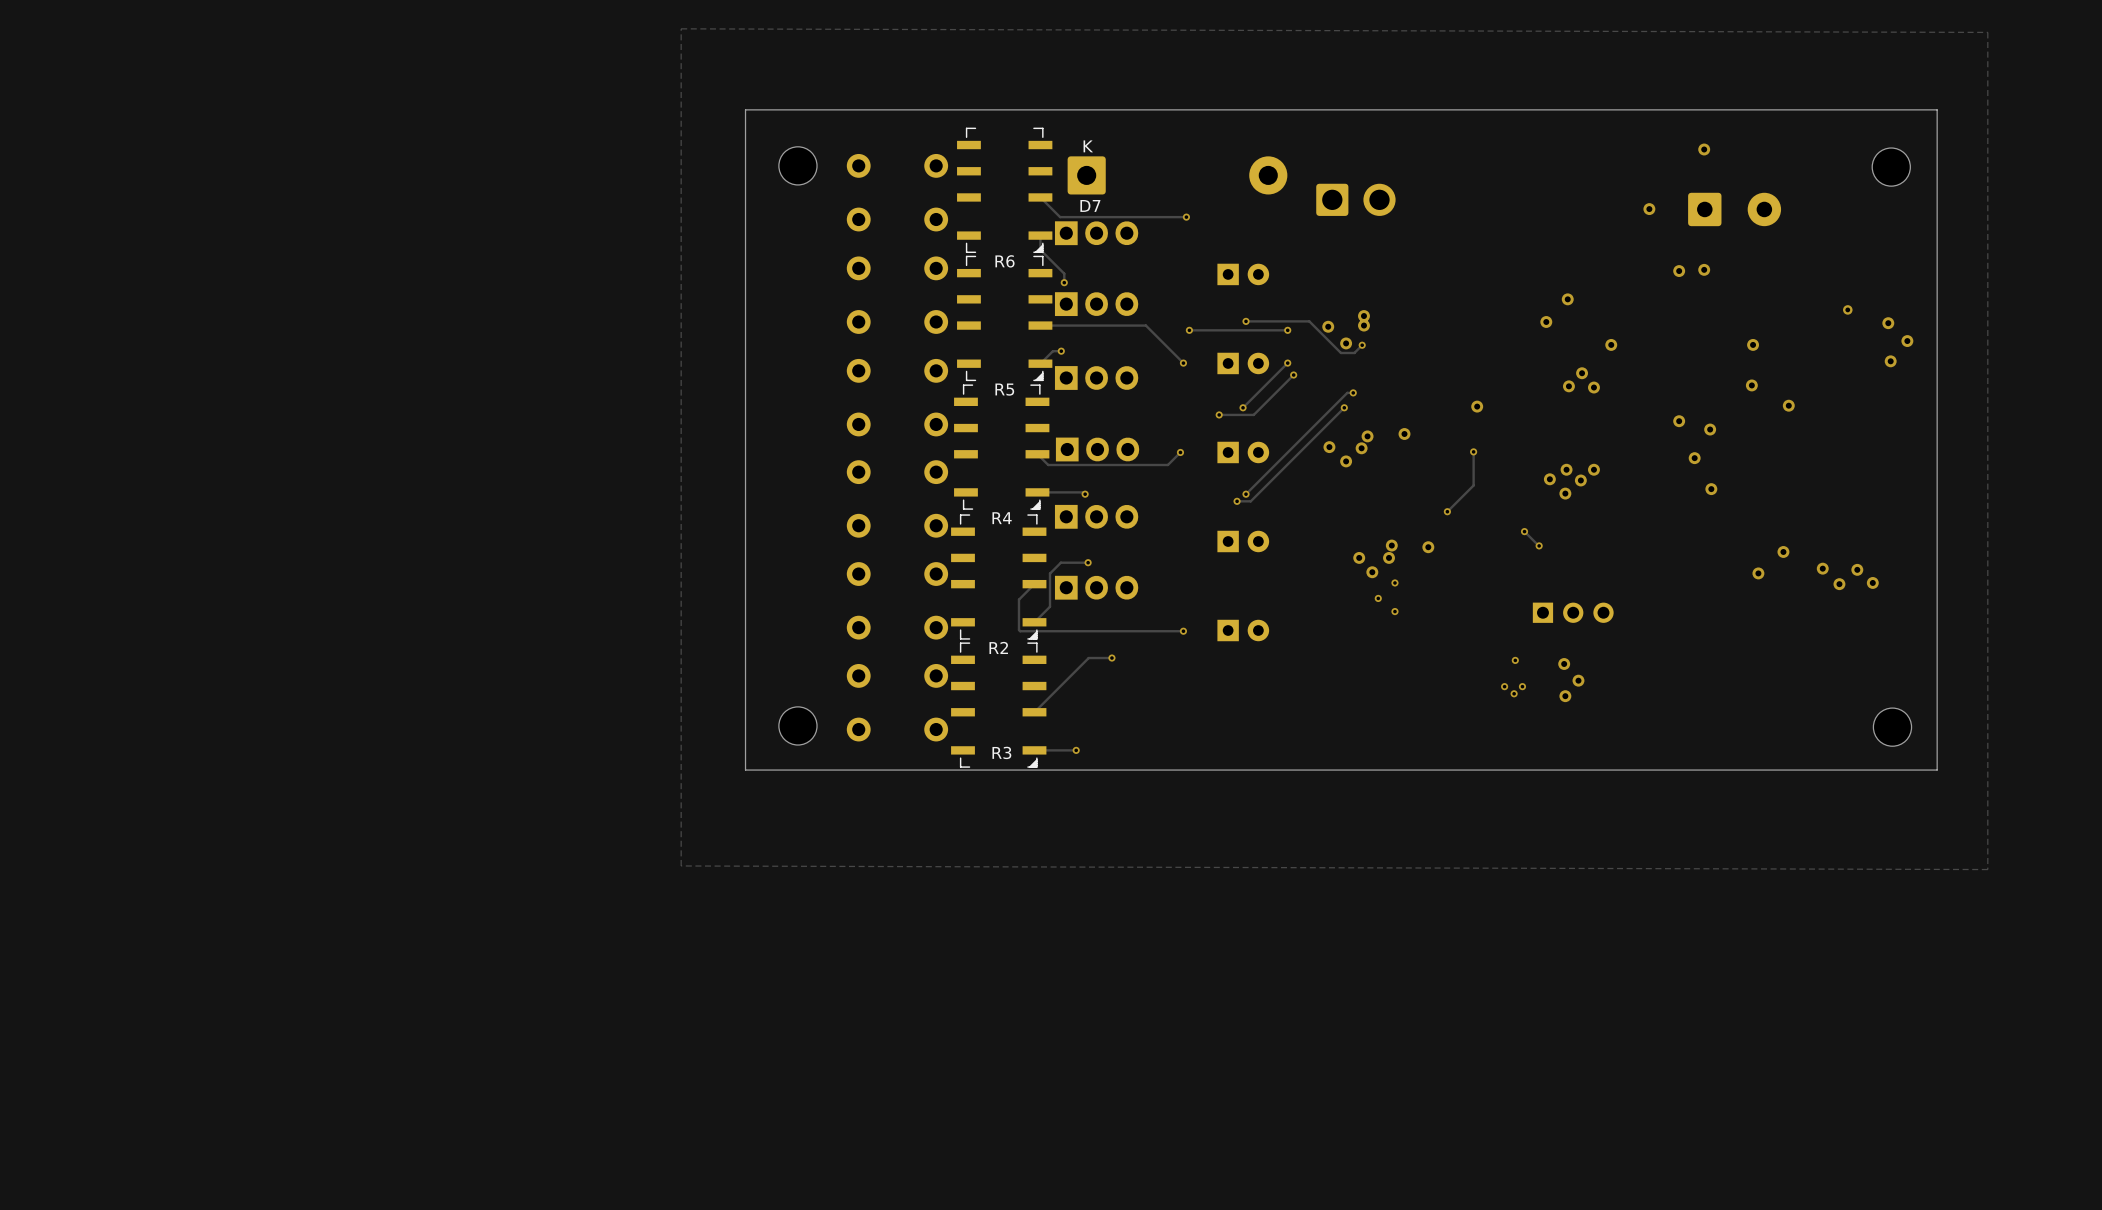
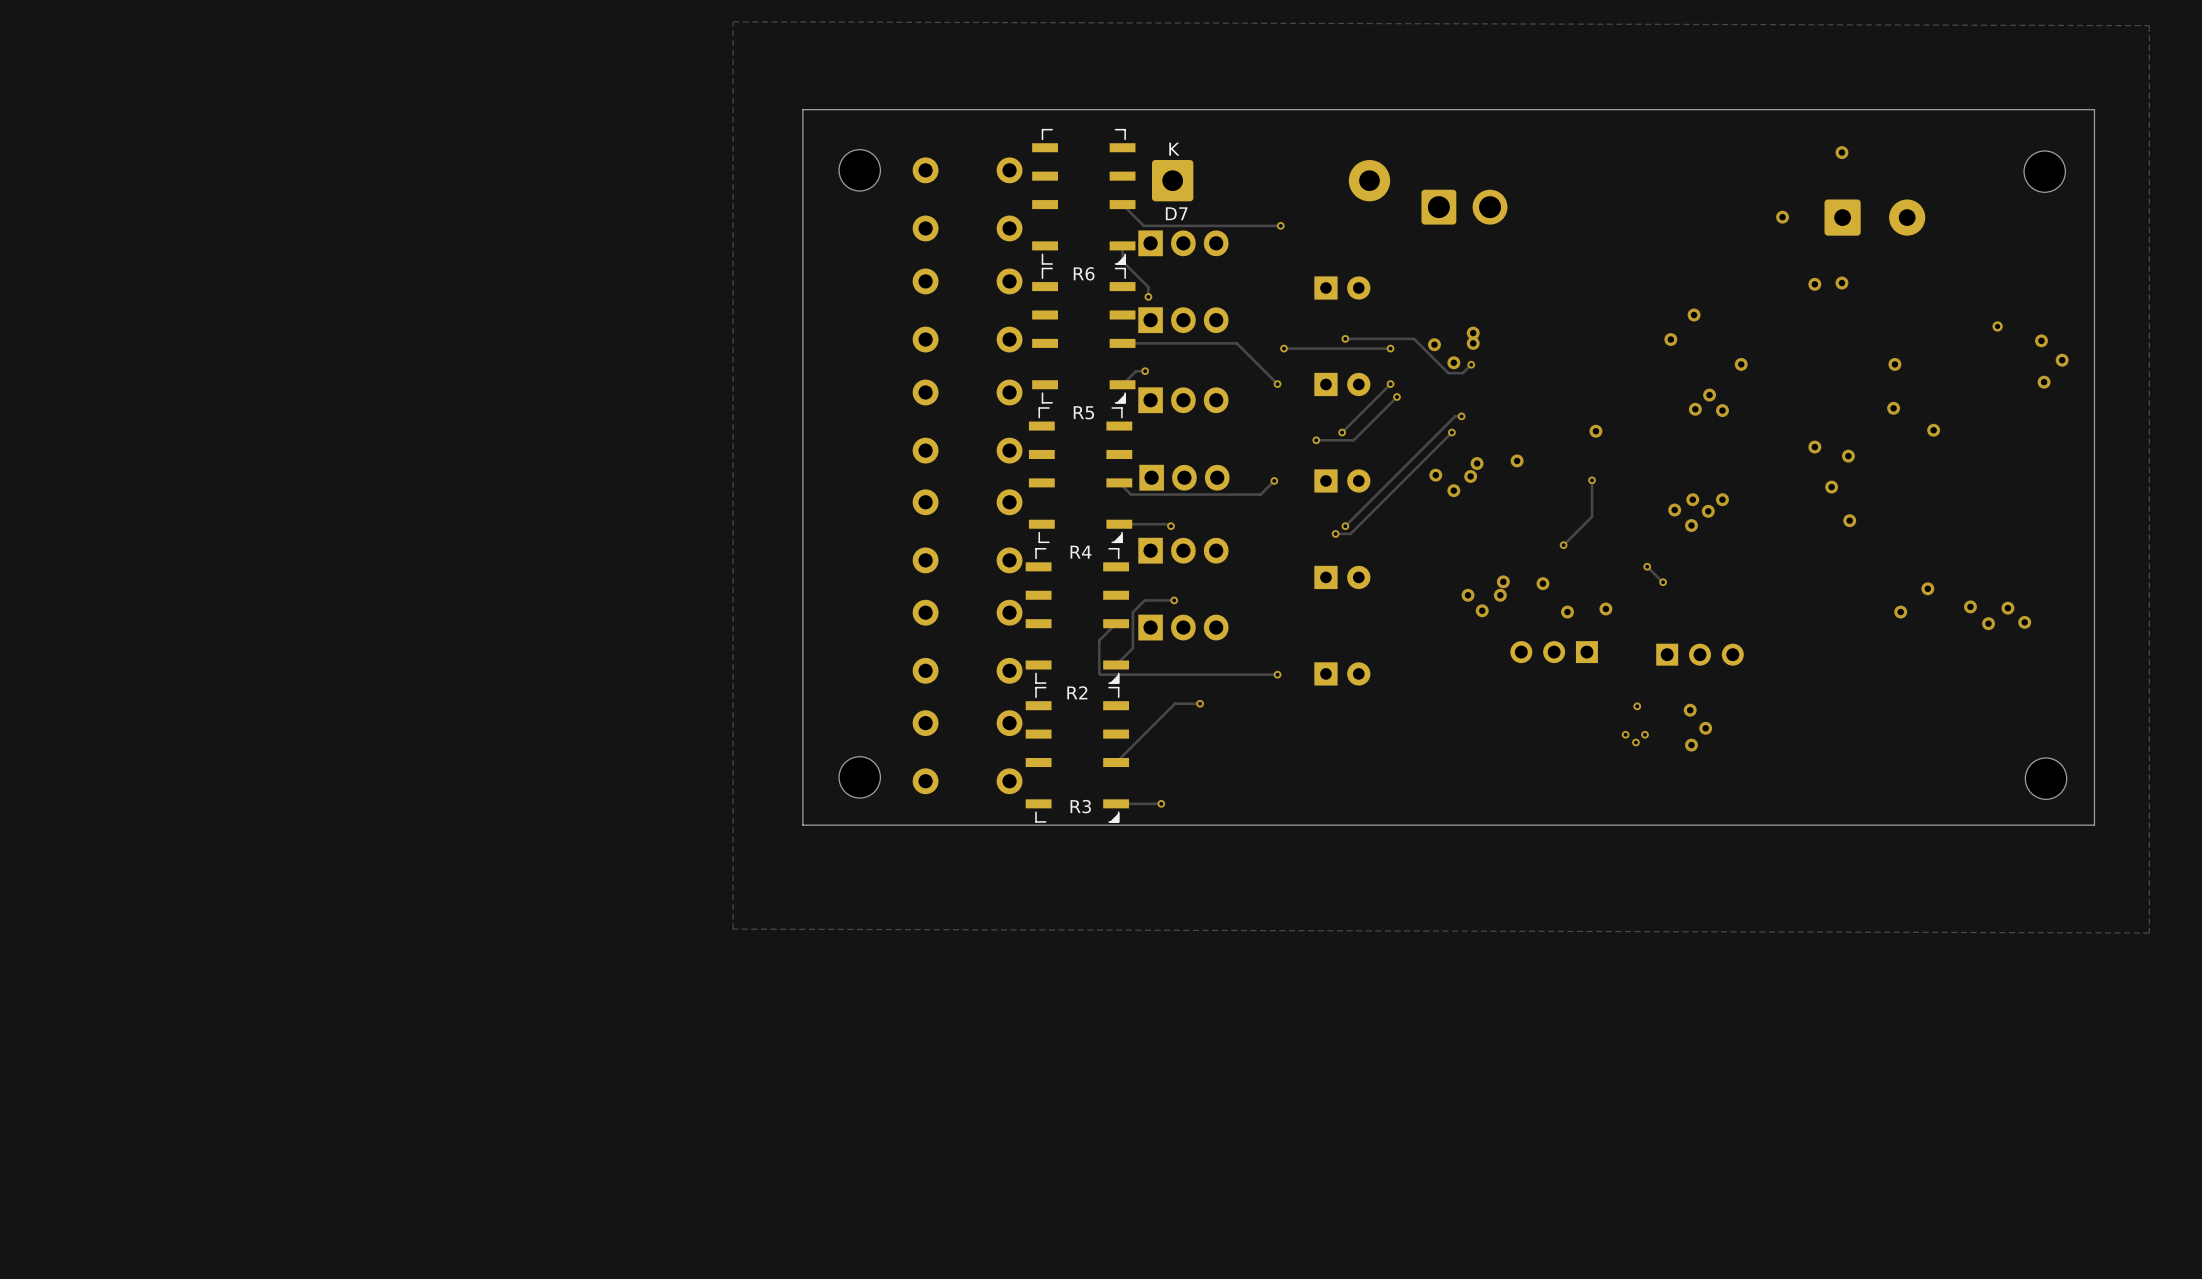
via: none -> (1605, 608)
via: none -> (1567, 612)
via: (1394, 582) -> none
via: (1378, 598) -> none
part: none -> (1554, 652)
via: (1394, 611) -> none

